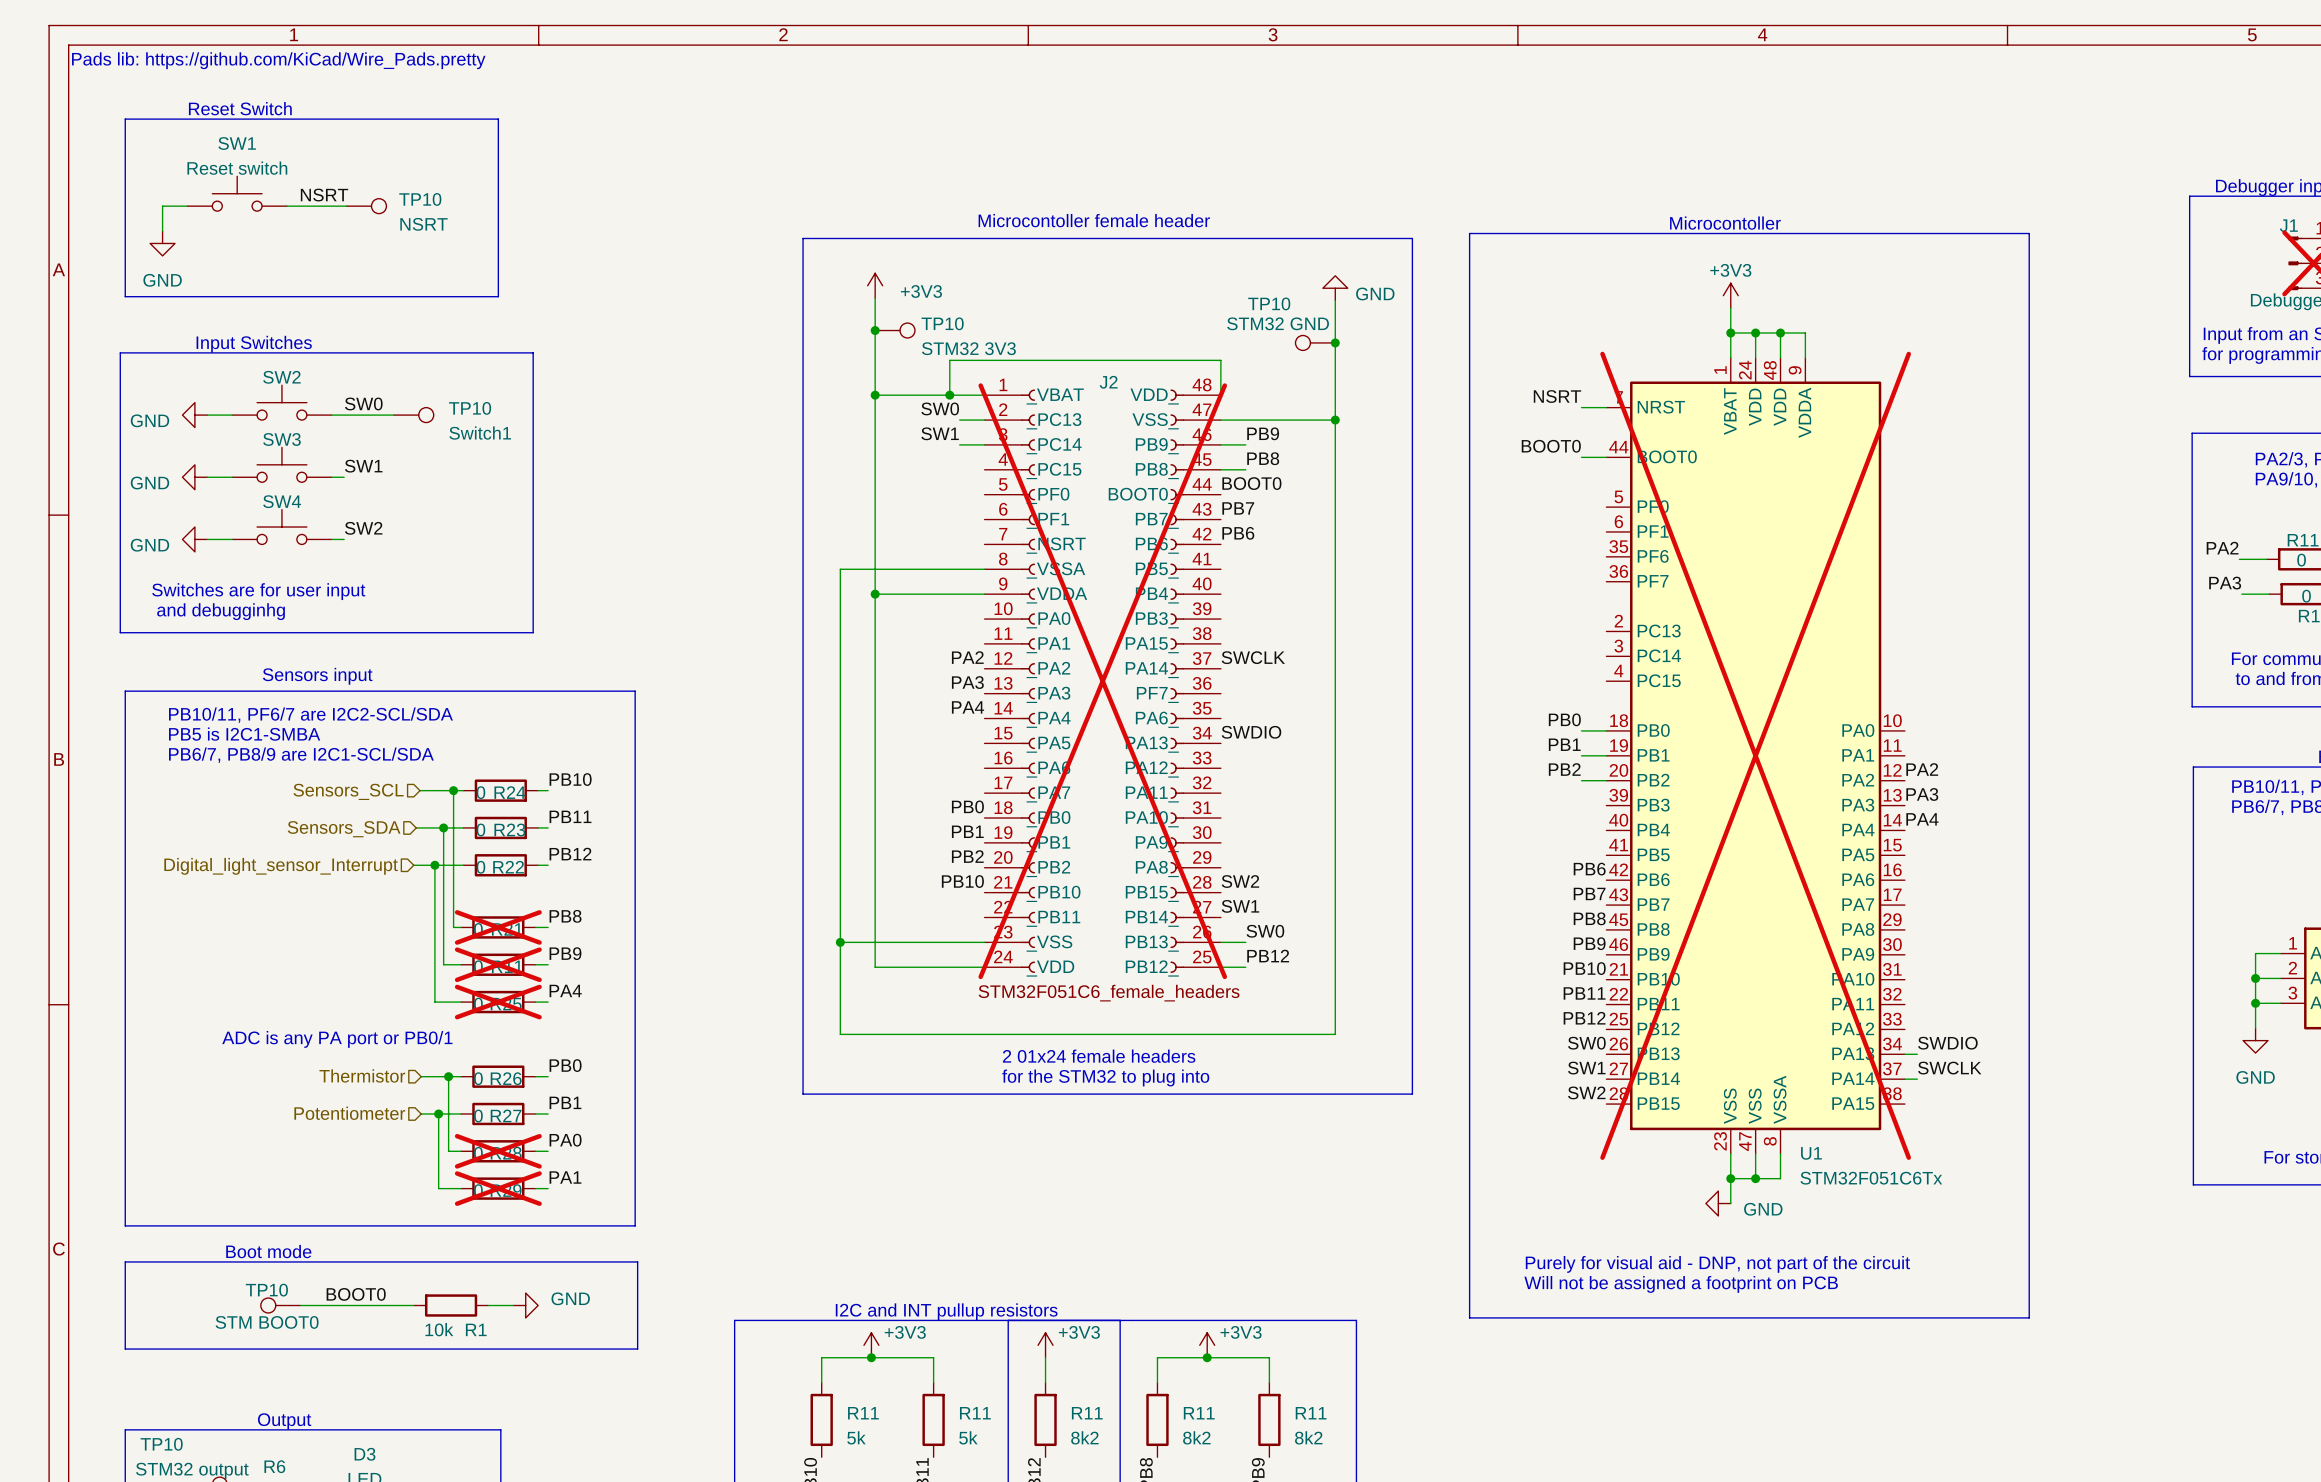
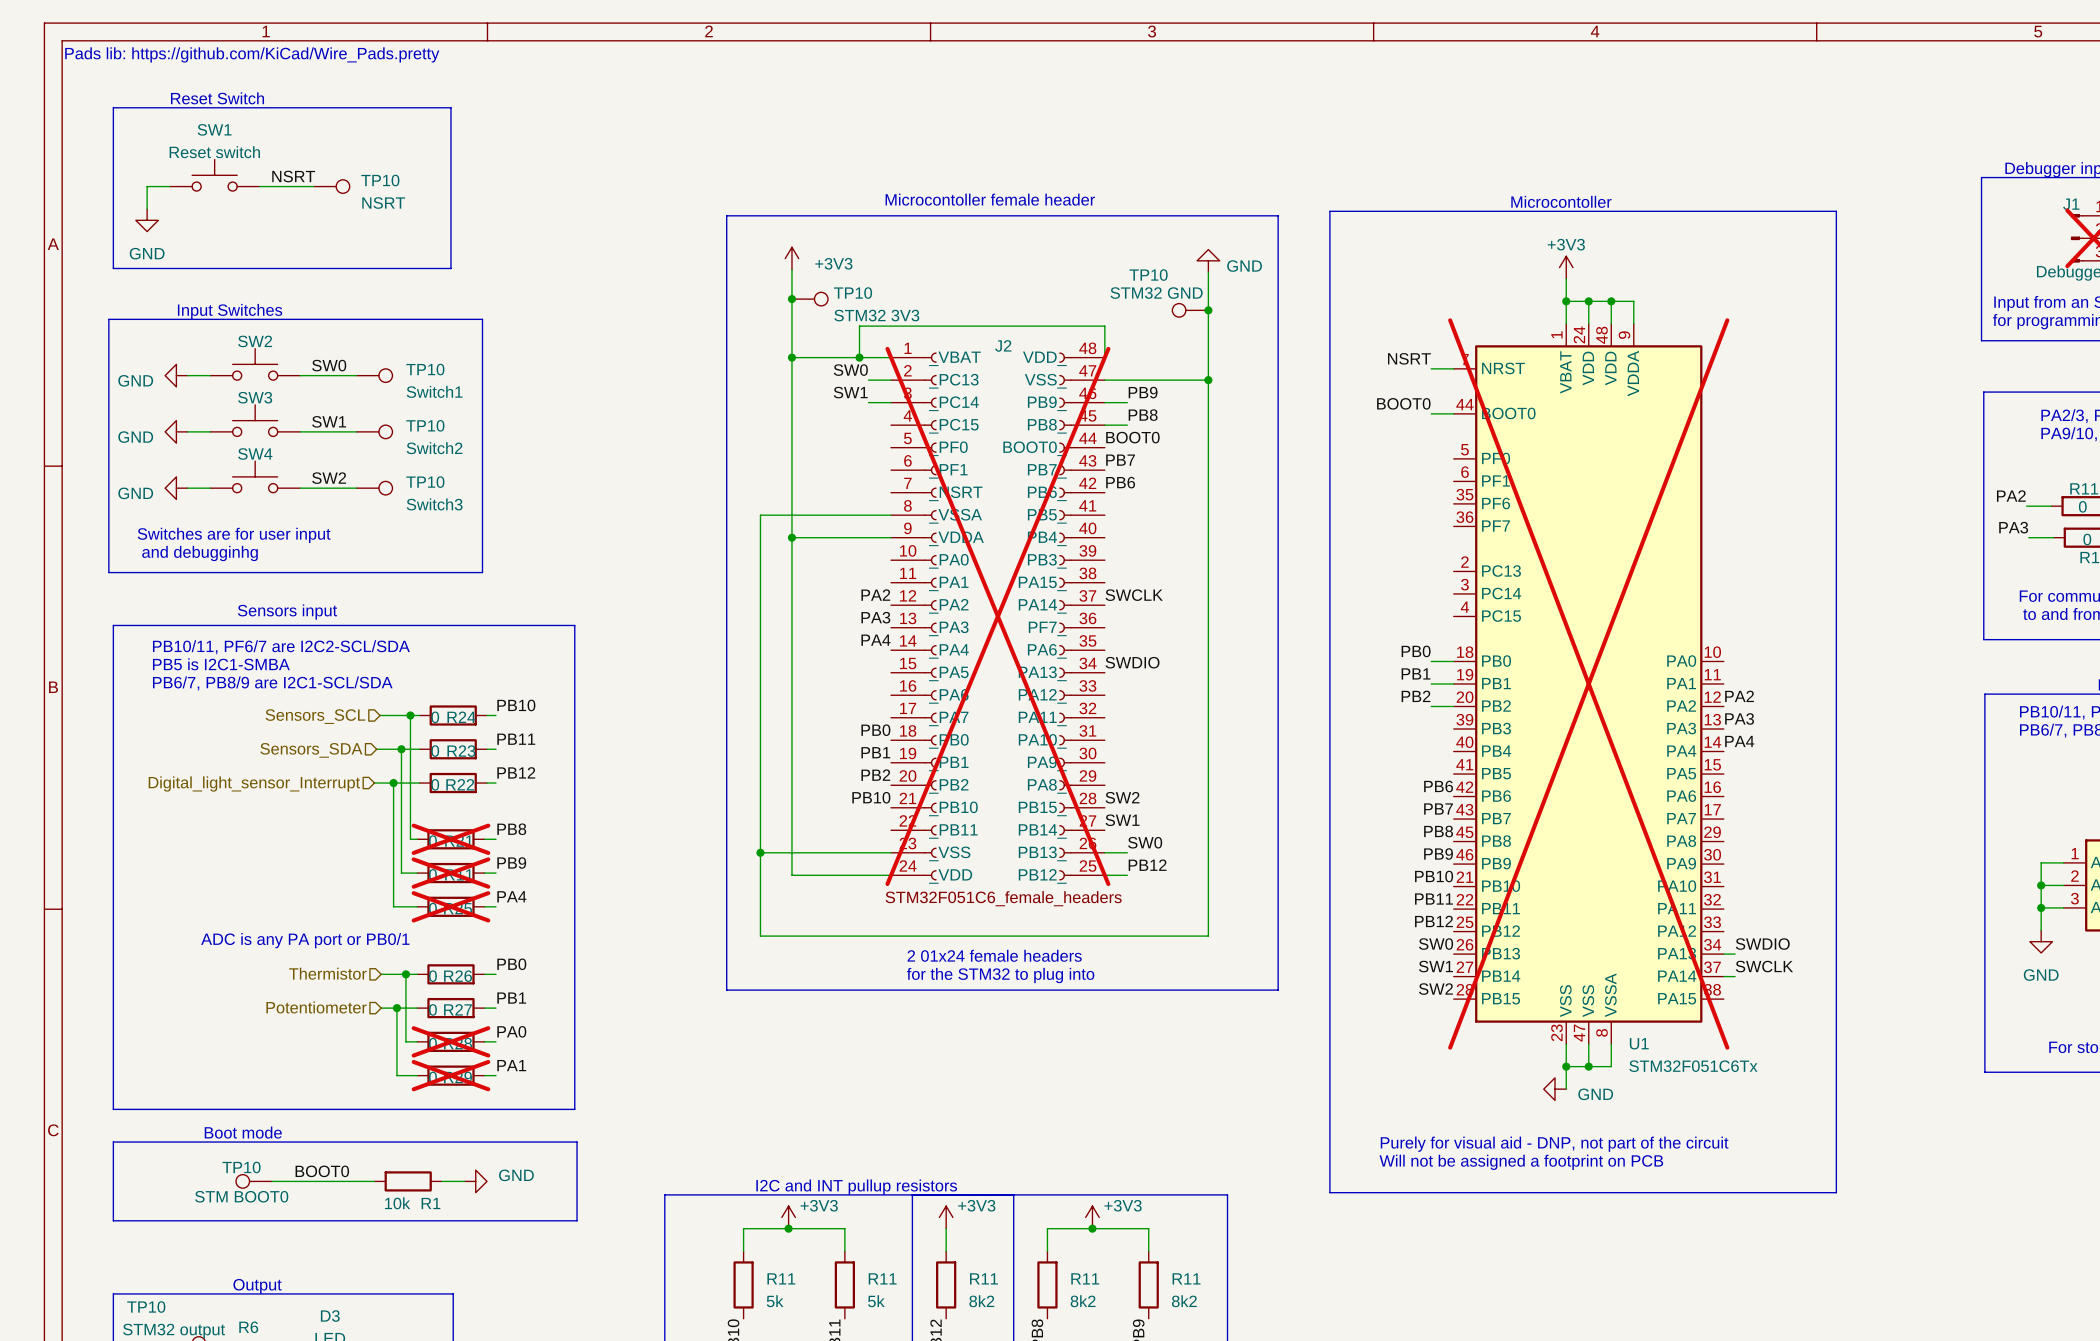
wire: none -> (311, 431) (356, 431)
TP10: none -> Switch2 (374, 431)
wire: none -> (311, 488) (356, 488)
TP10: none -> Switch3 (374, 488)

